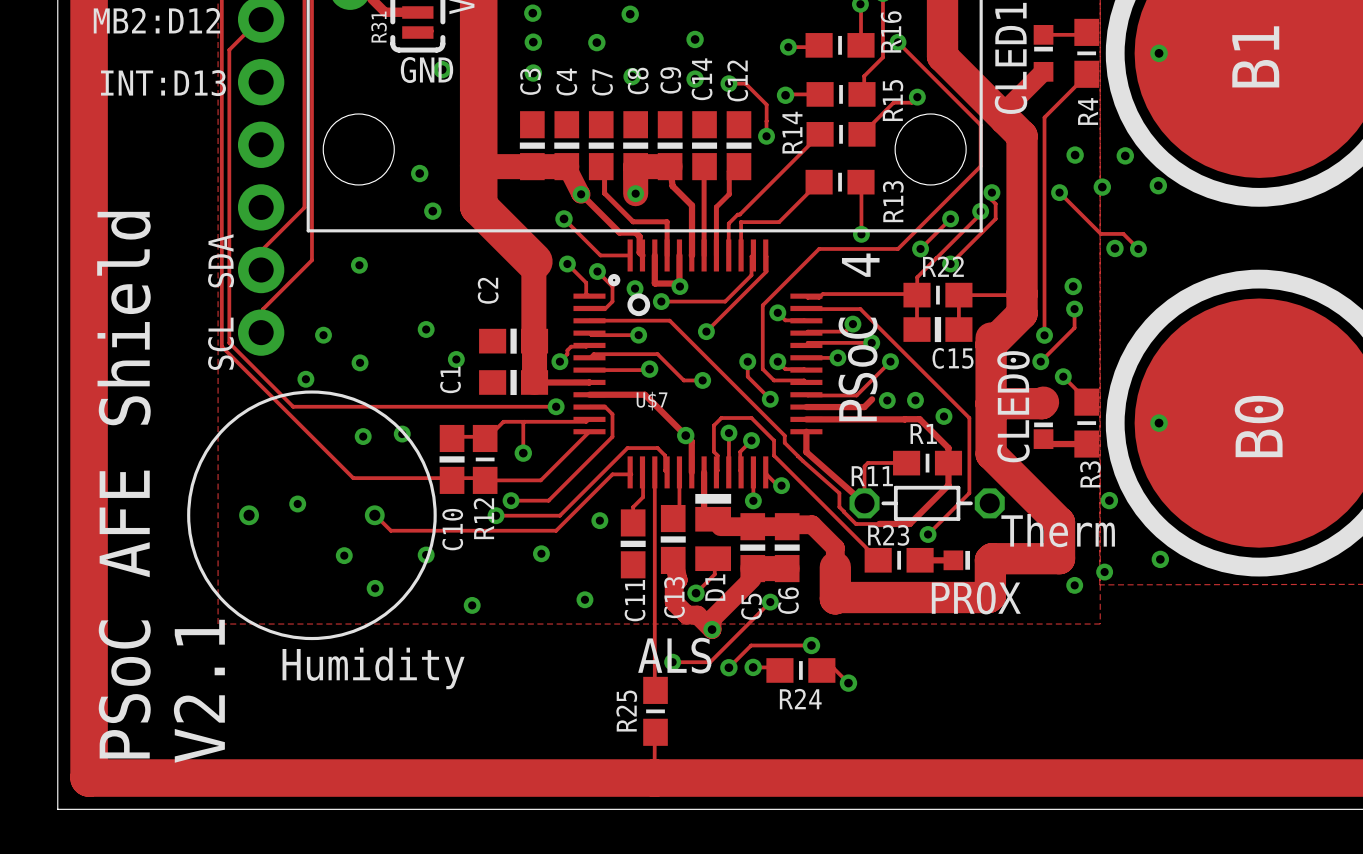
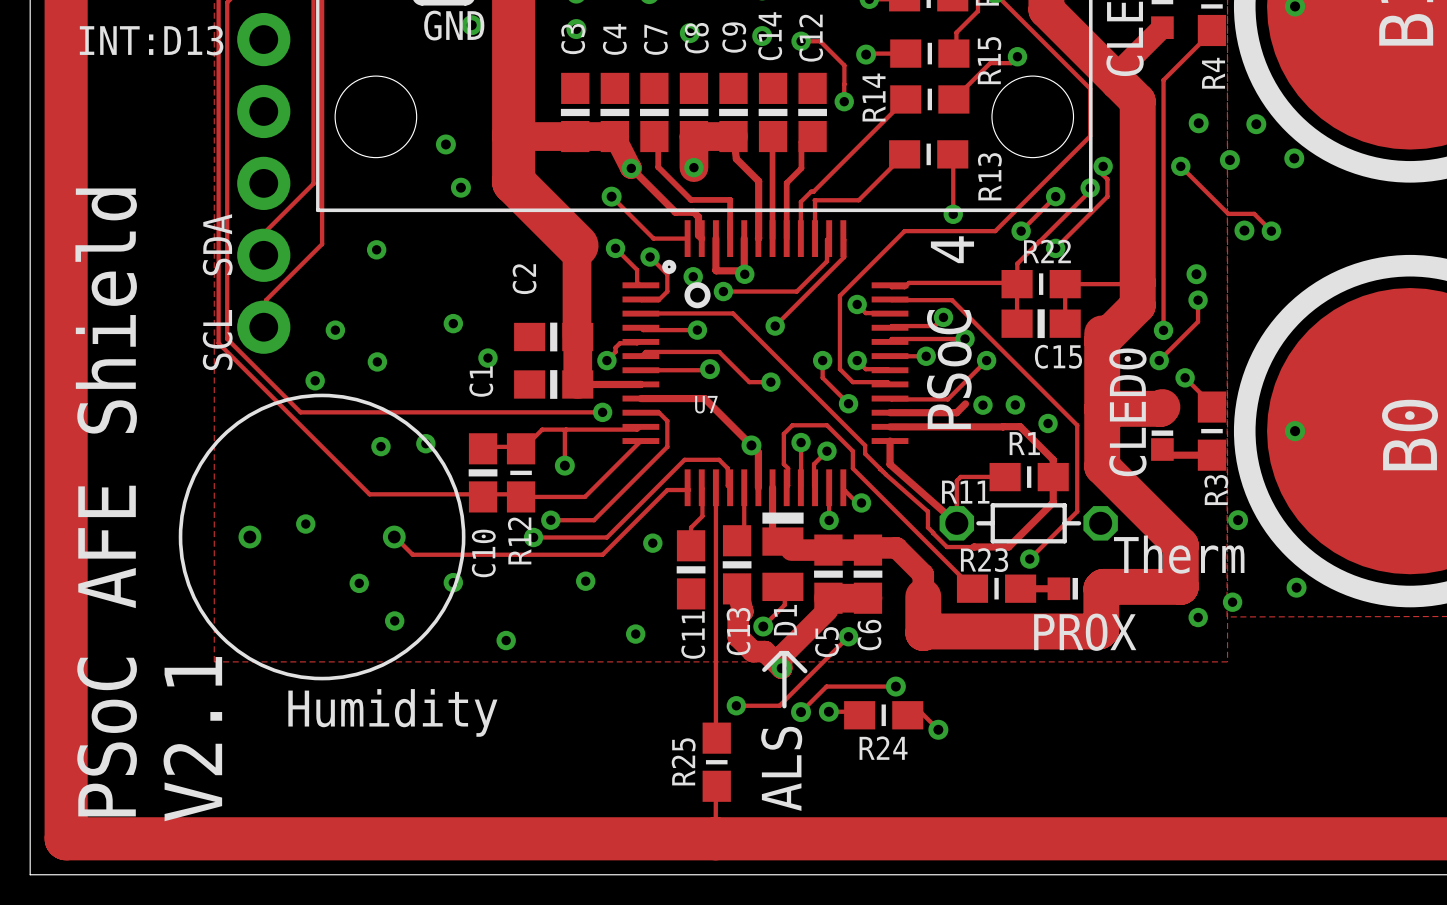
U$7 name: U$7 (652, 401) -> U7 (706, 404)
line: none -> (784, 653) (784, 706)
line: none -> (764, 669) (781, 653) (787, 653) (805, 671)
text rotation: 0° (674, 655) -> 90° counterclockwise (781, 768)

